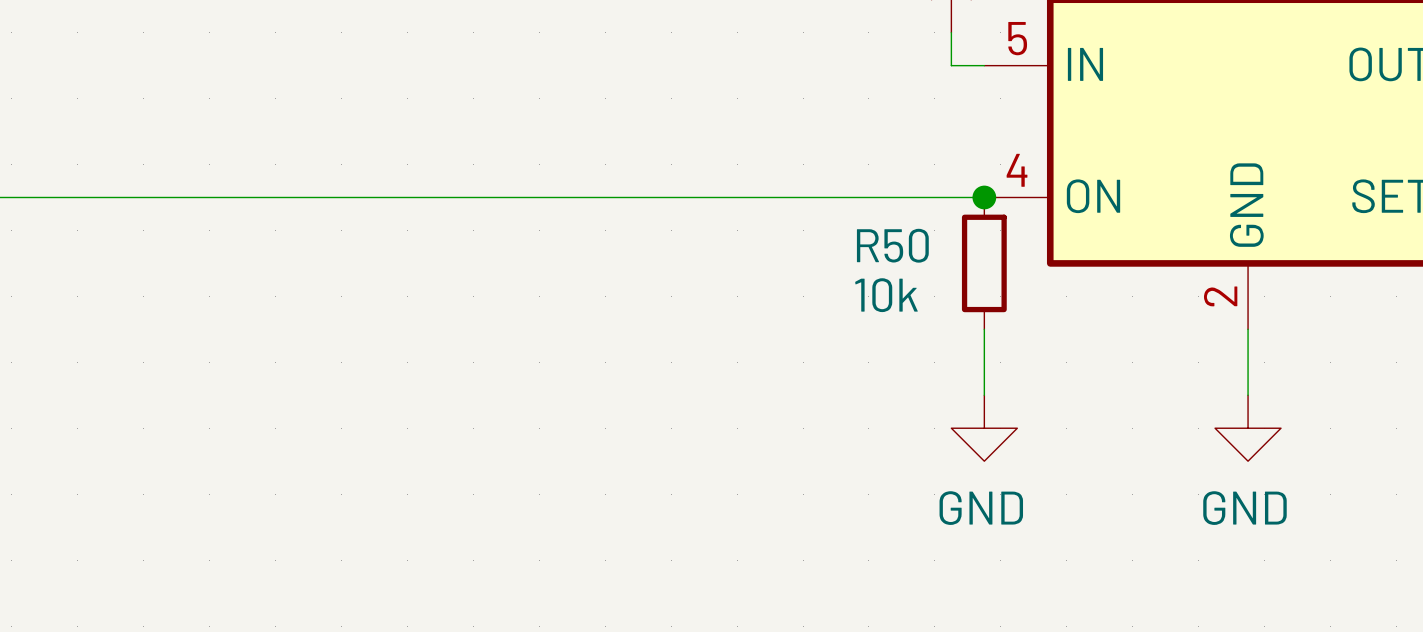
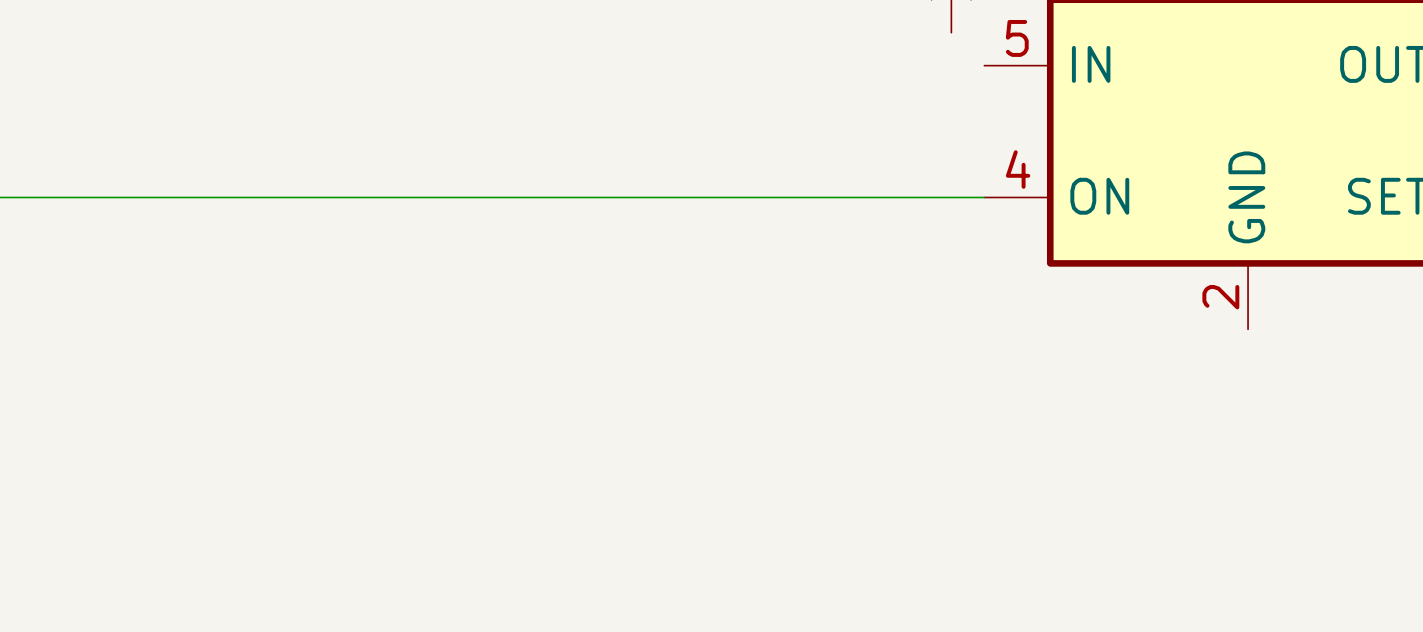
wire: (951, 32) (951, 65) (984, 65) -> none
junction: (984, 197) -> none
R50: 10k (984, 263) -> none
wire: (984, 329) (984, 395) -> none
wire: (1248, 329) (1248, 395) -> none
power symbol: GND (984, 428) -> none
power symbol: GND (1248, 428) -> none

